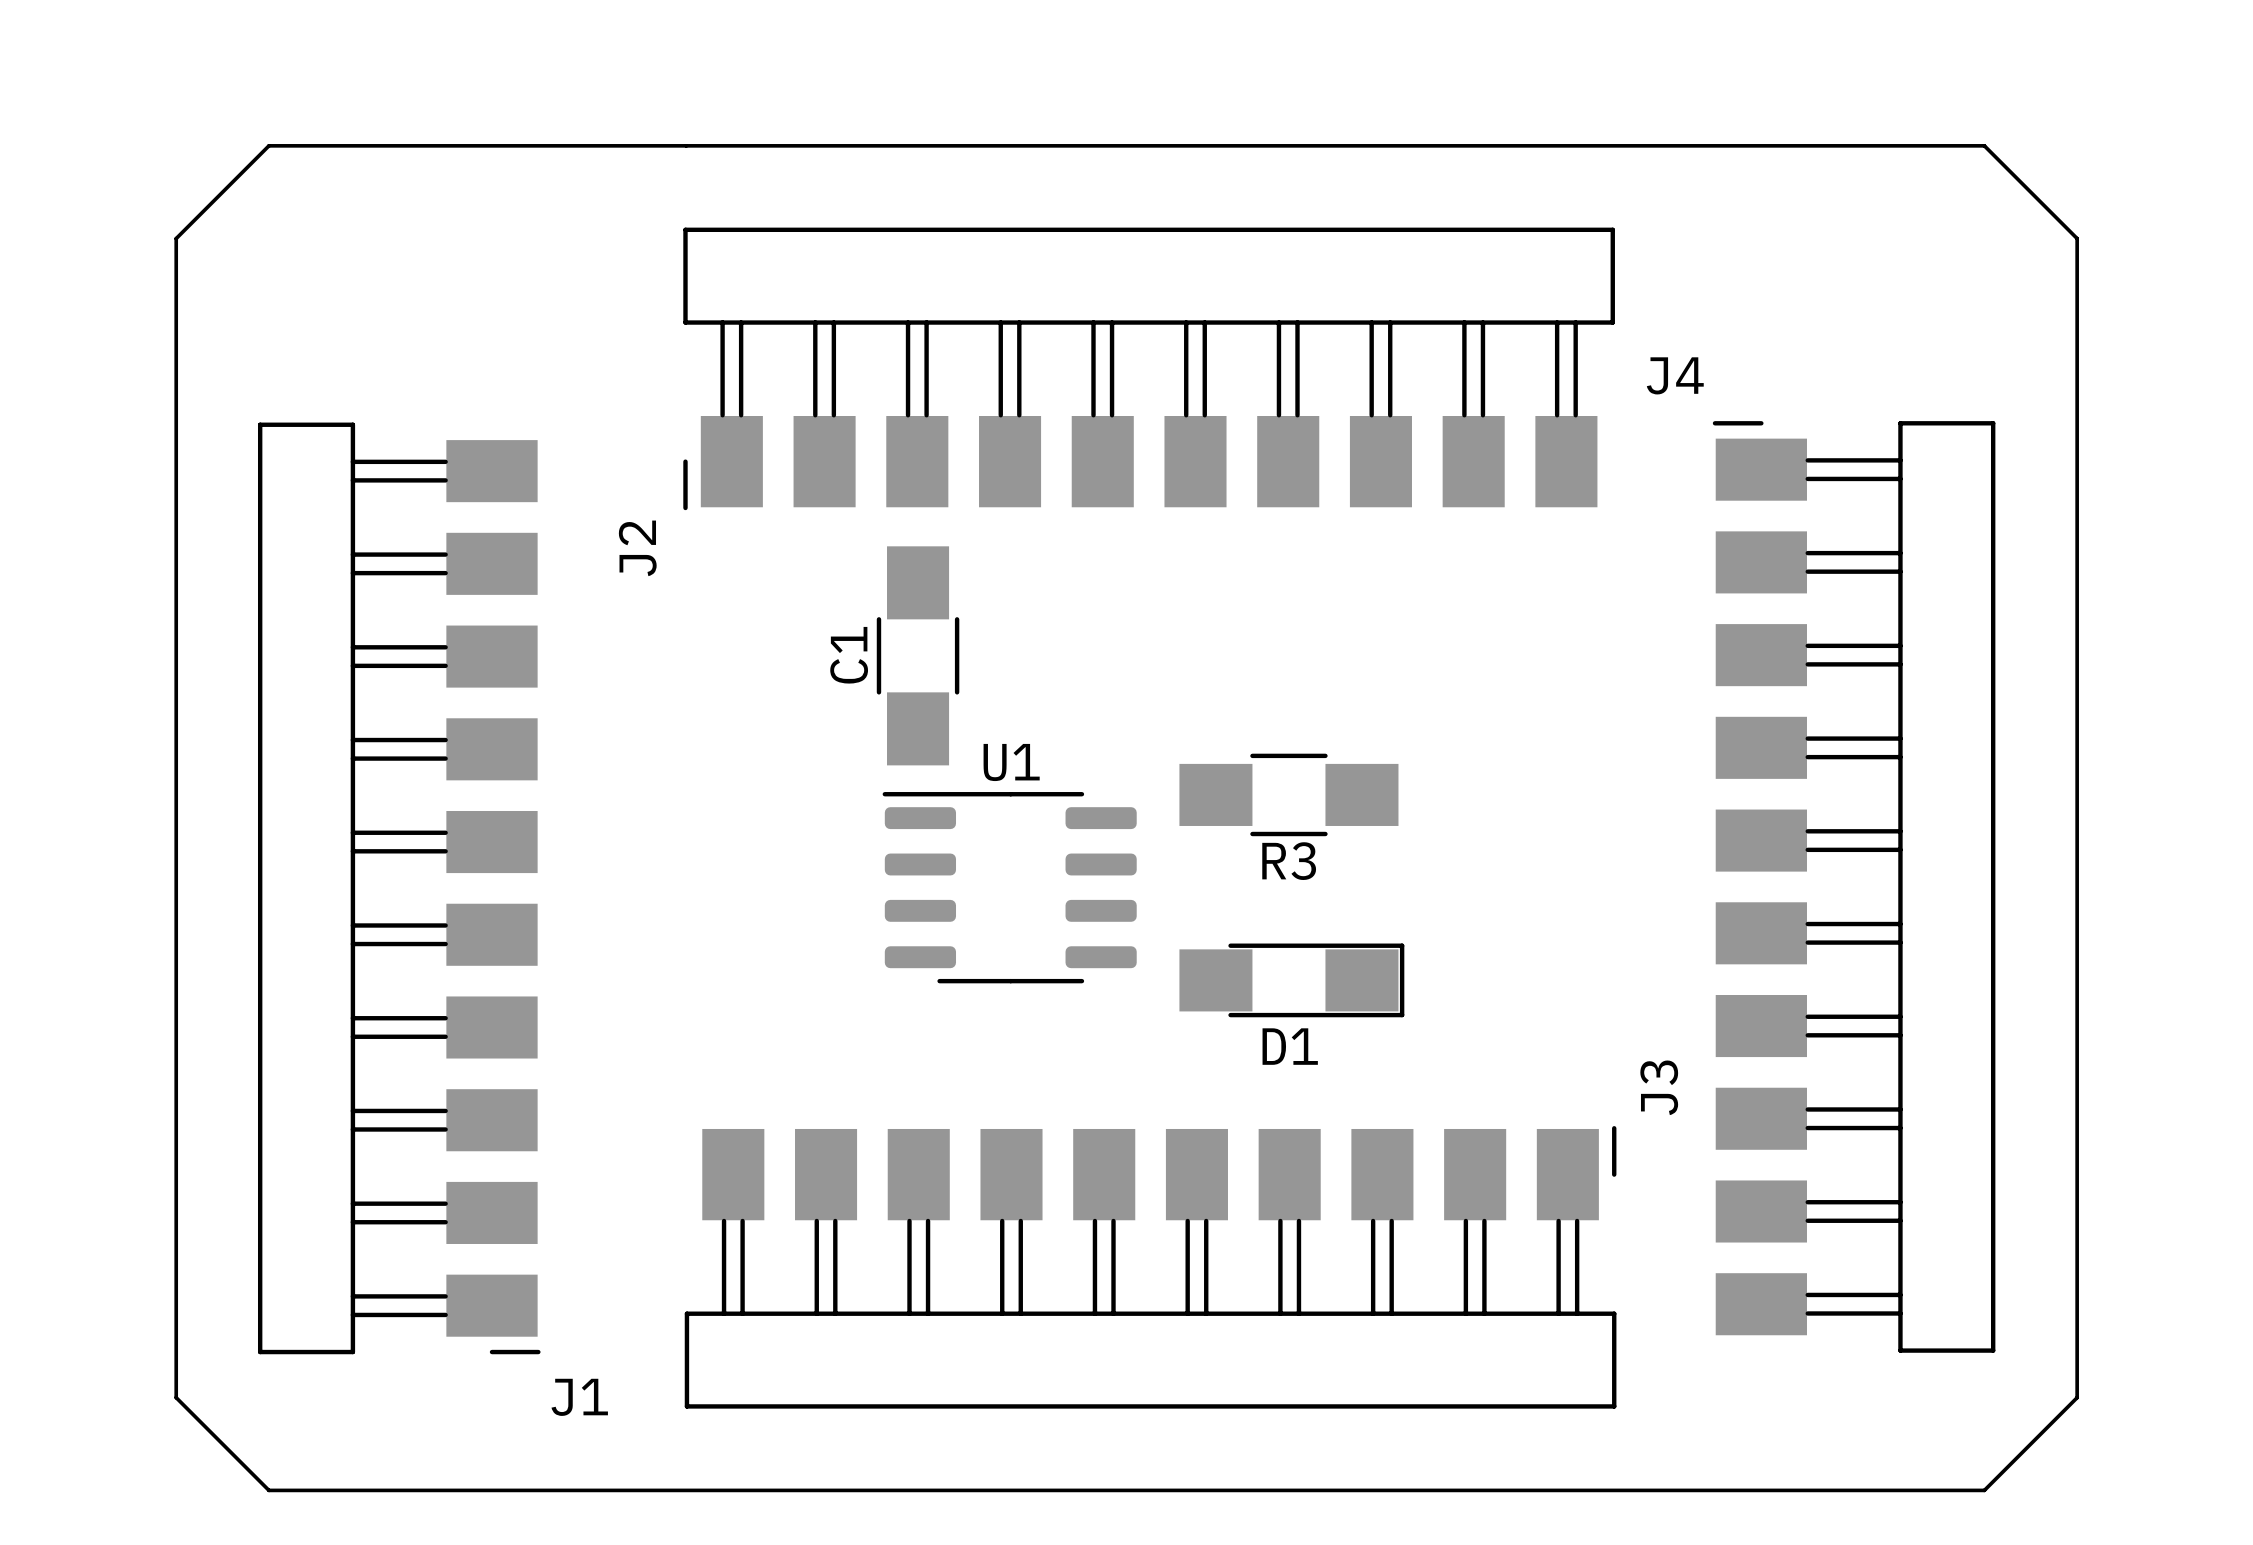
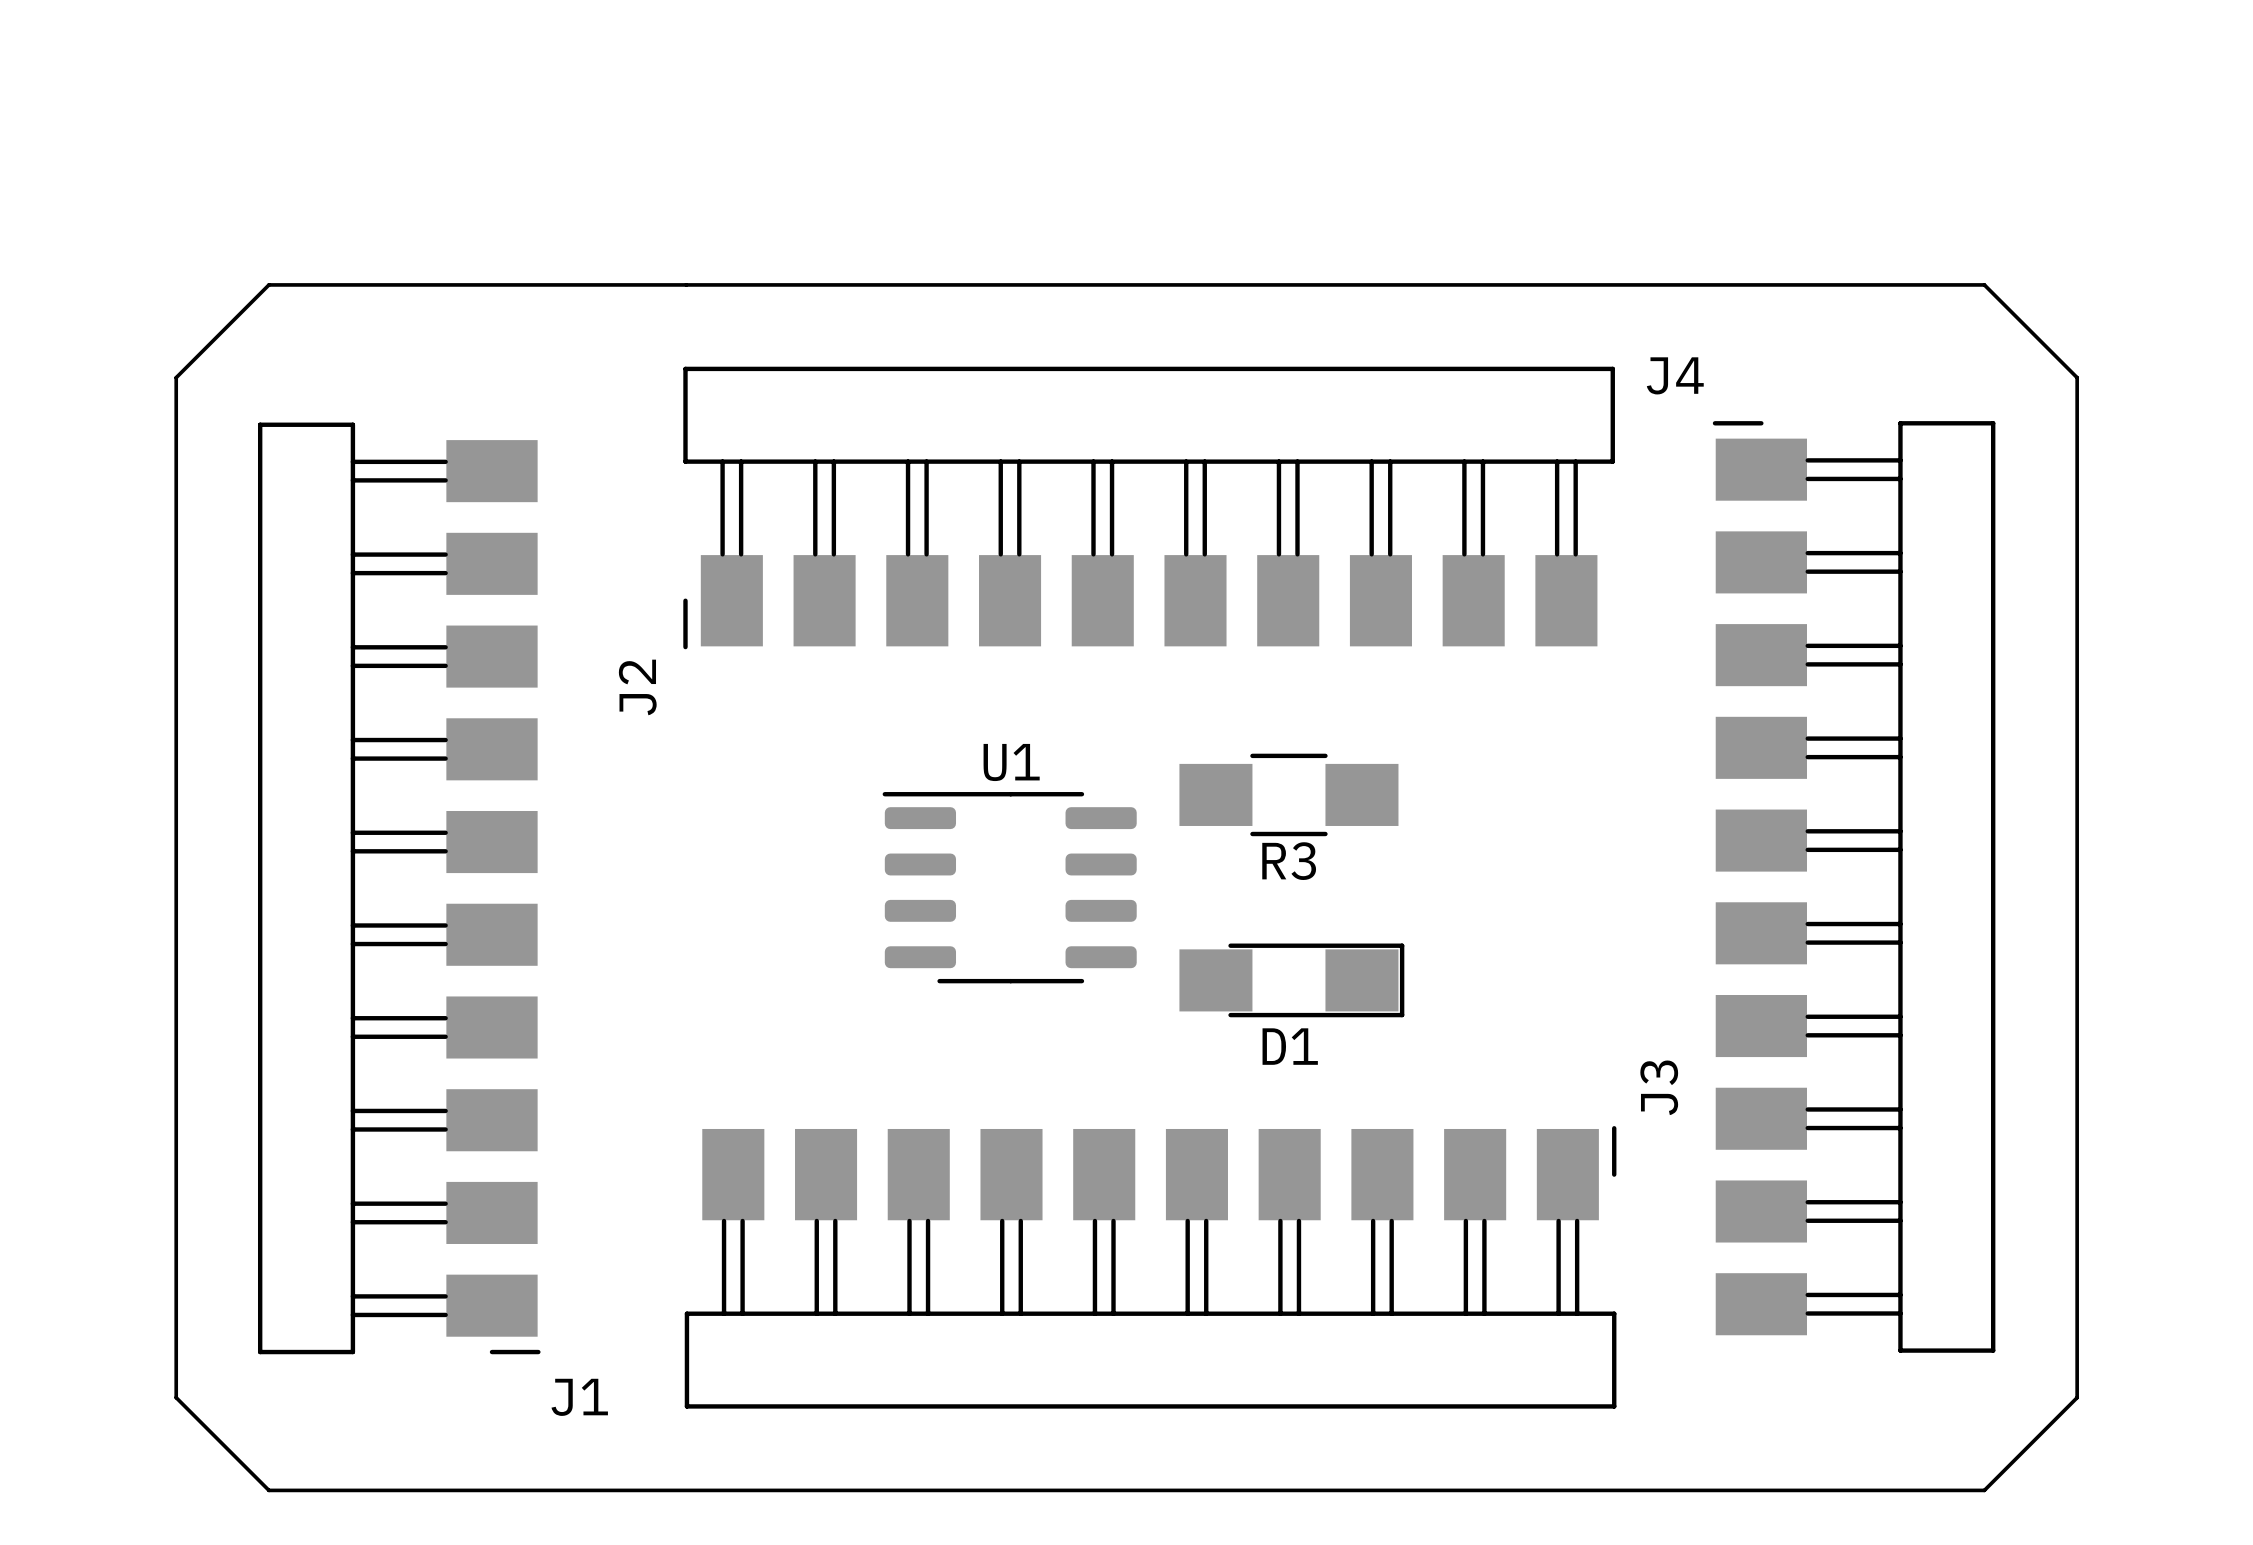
J2 position: (1149, 368) -> (1149, 507)
board edge: (176, 377) (176, 238) (268, 145) (1984, 145) (2077, 238) (2077, 377) -> (176, 377) (268, 284) (1984, 284) (2077, 377)
C1: (918, 655) -> none

